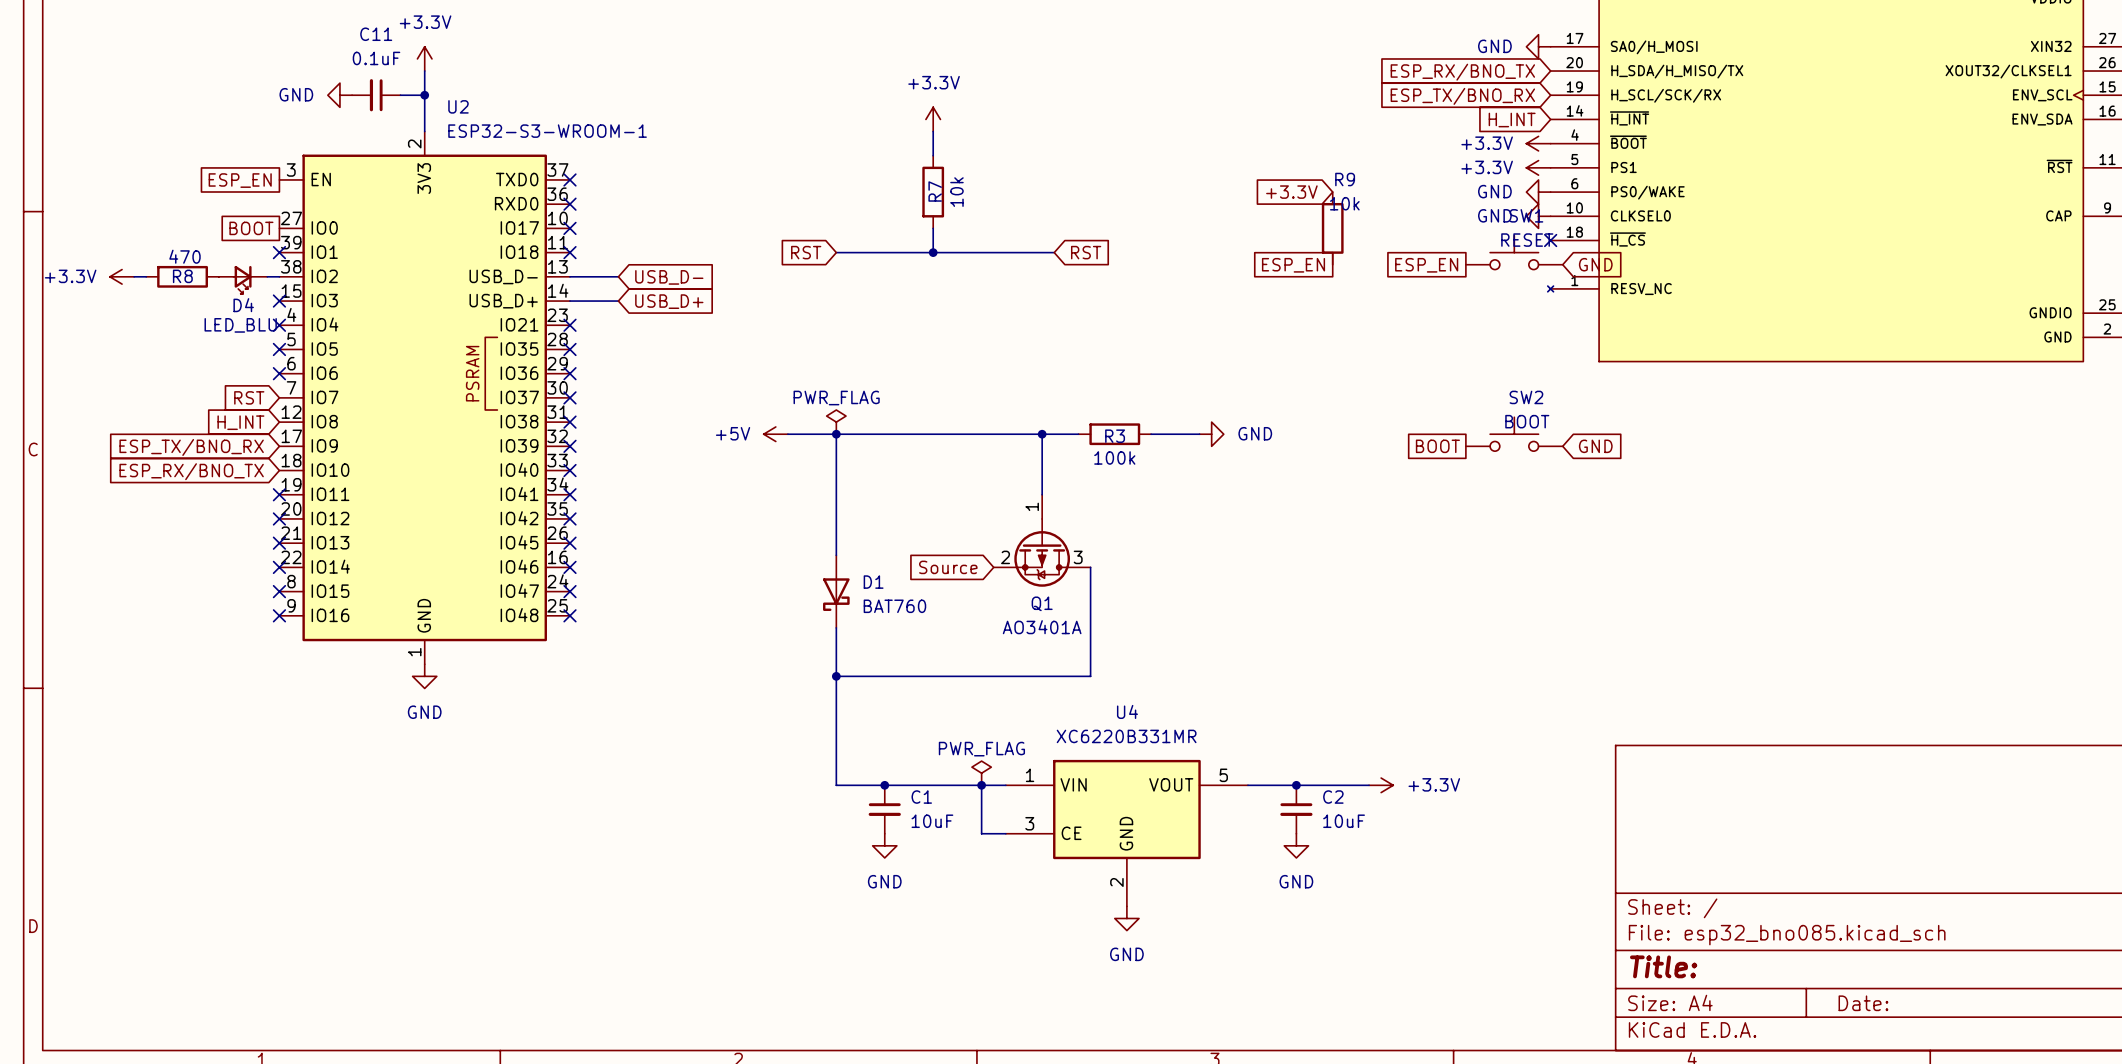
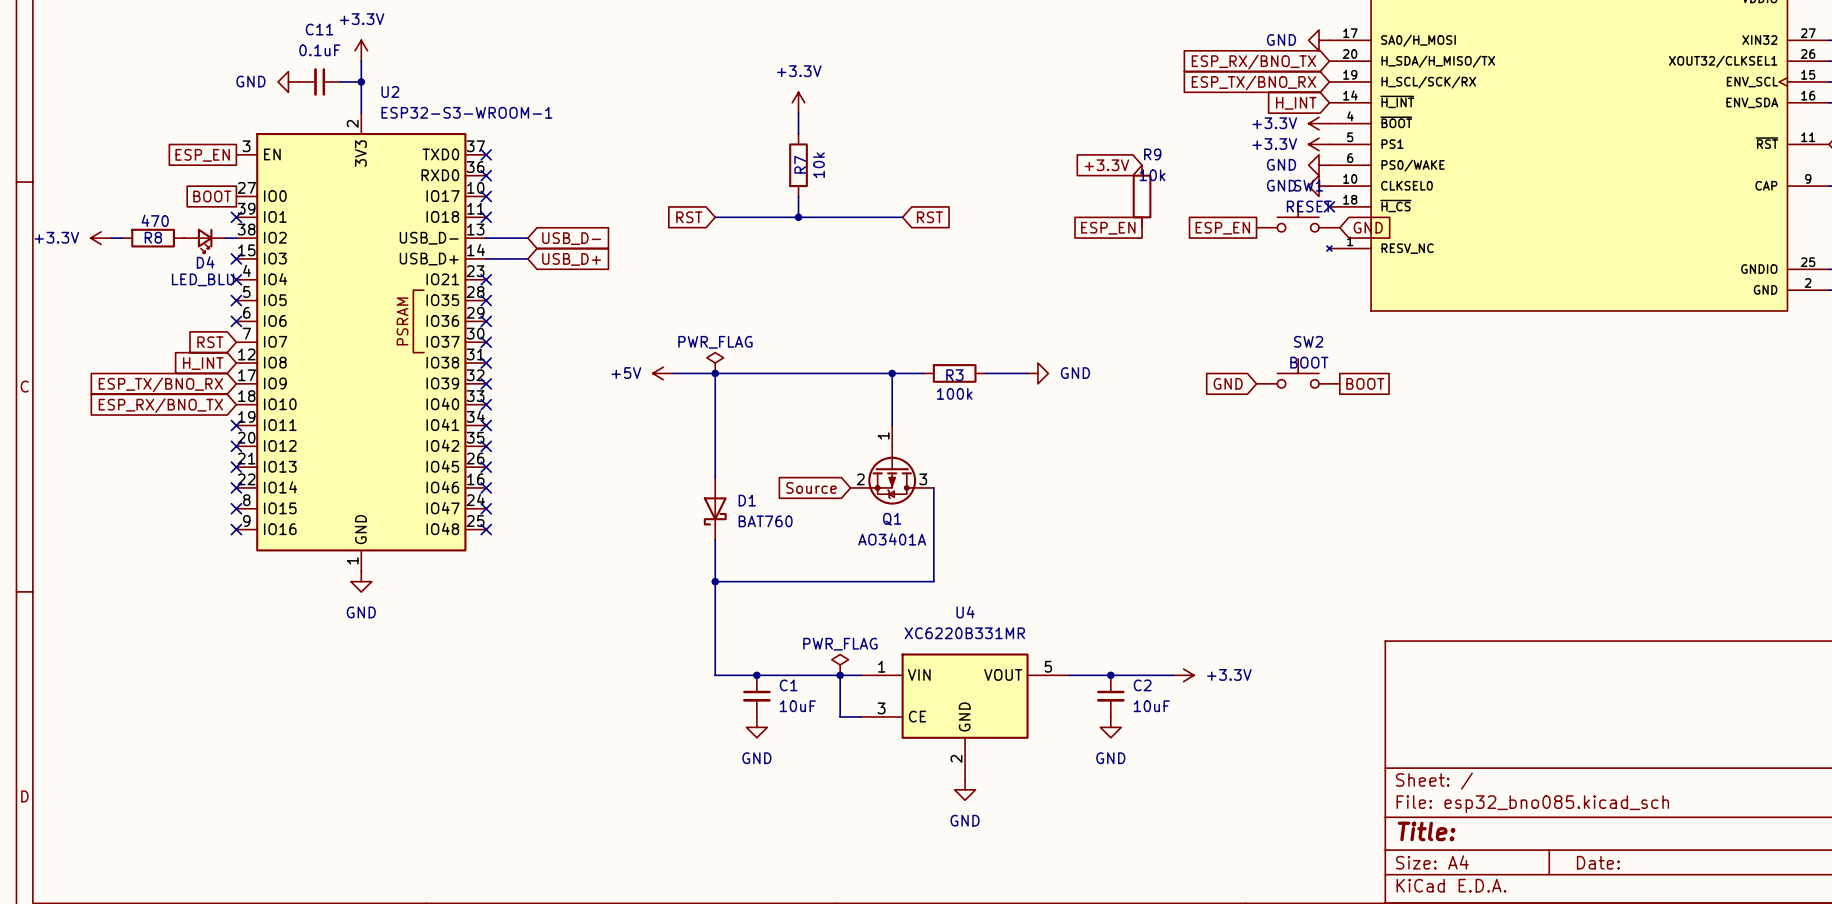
global label shape: passive (1437, 446) -> input (1228, 383)
global label: BOOT (1437, 446) -> GND (1228, 383)
global label shape: input (1595, 446) -> passive (1365, 383)
global label: GND (1595, 446) -> BOOT (1365, 383)

